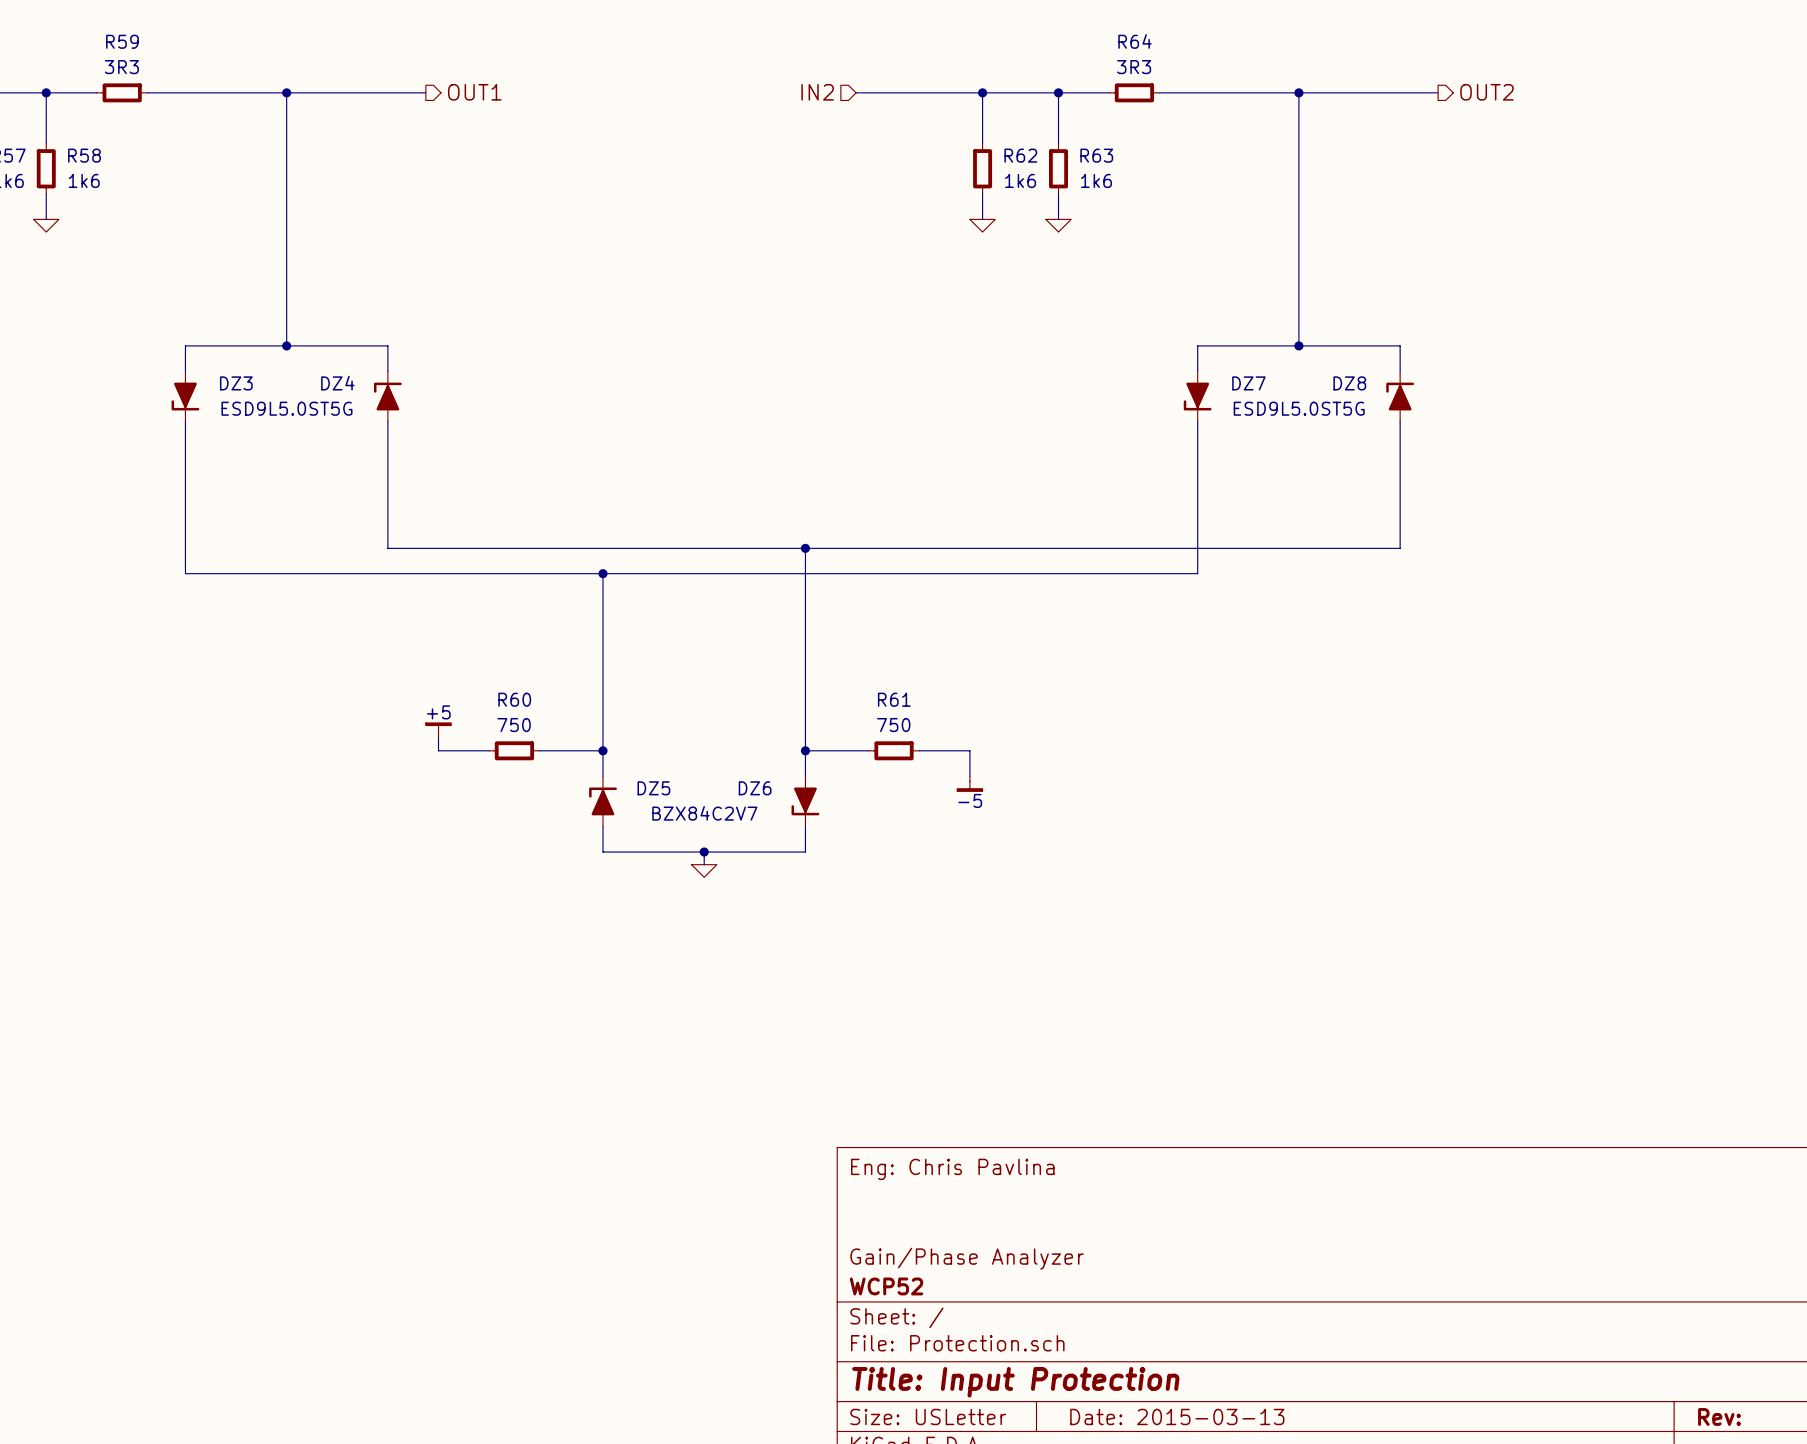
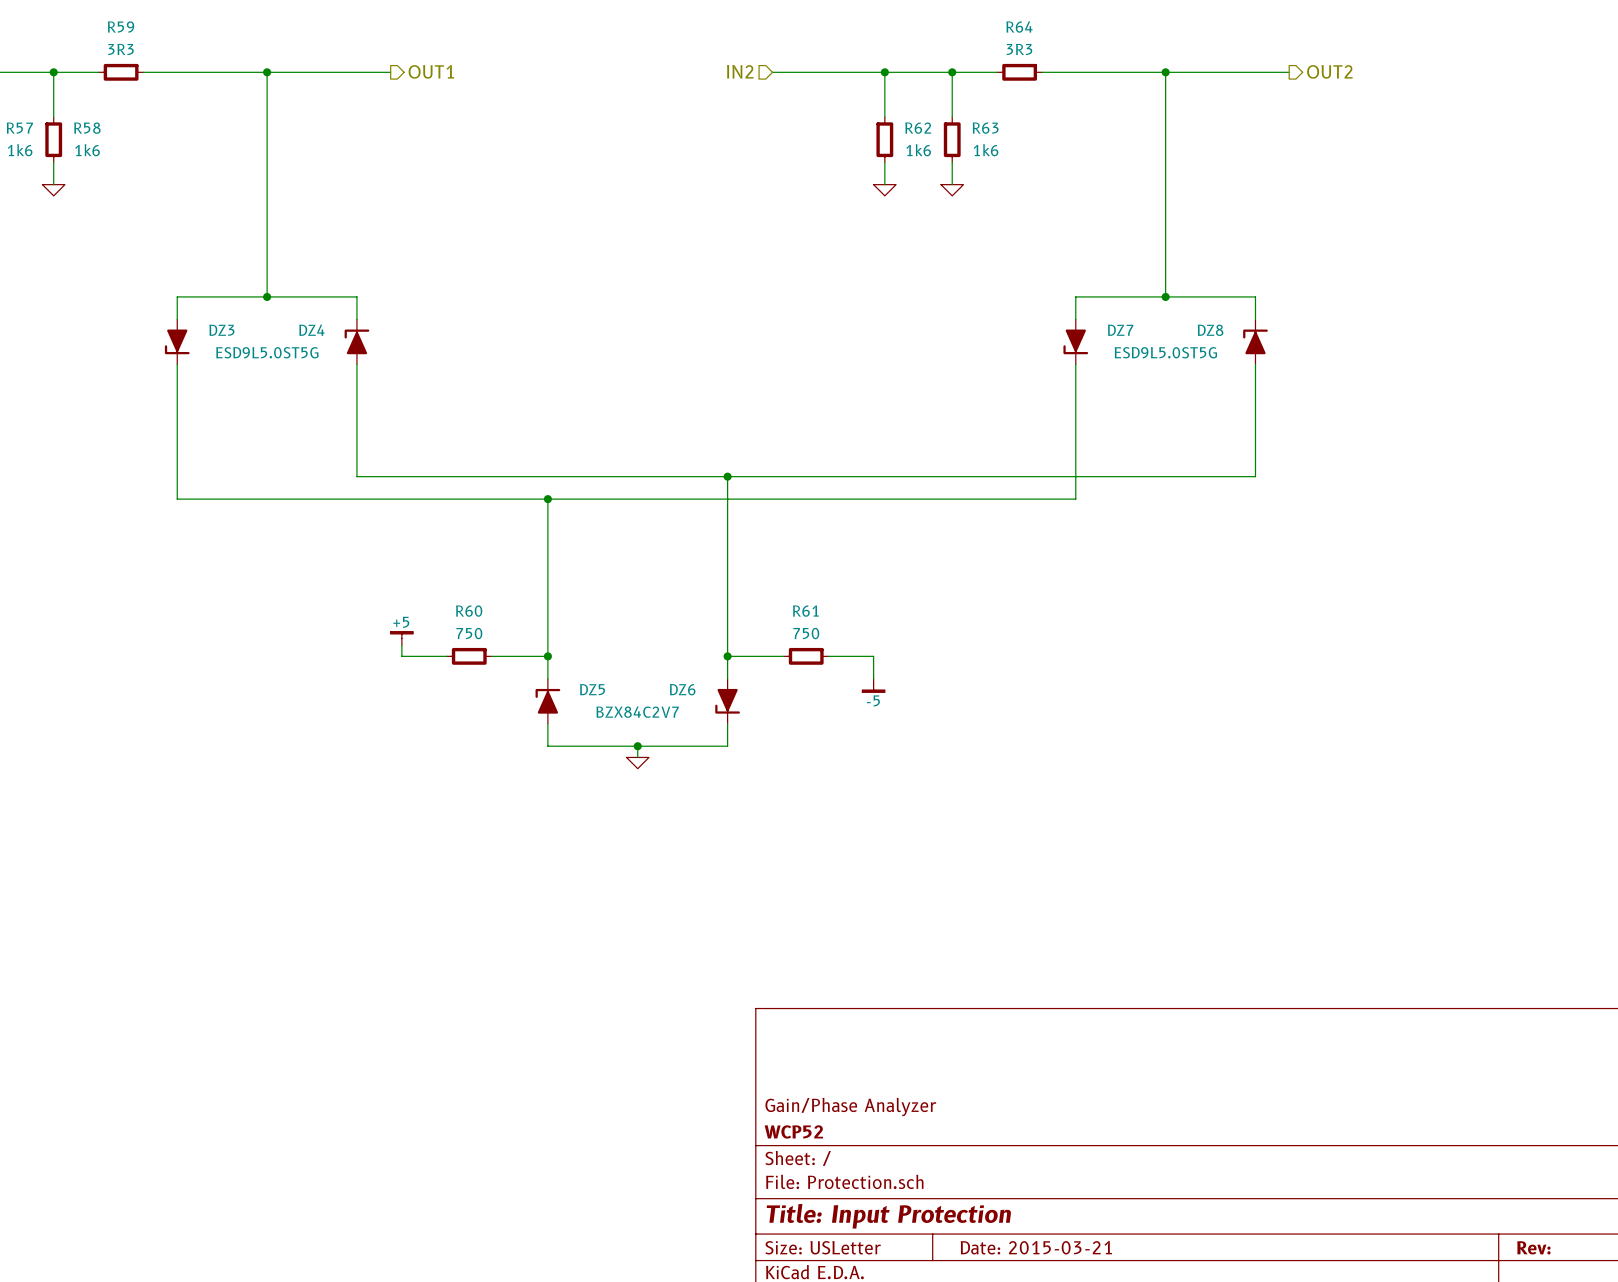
title block: Eng: Chris Pavlina (952, 1169) -> none
title block: Date: 2015-03-13 (1177, 1416) -> Date: 2015-03-21 (1036, 1247)

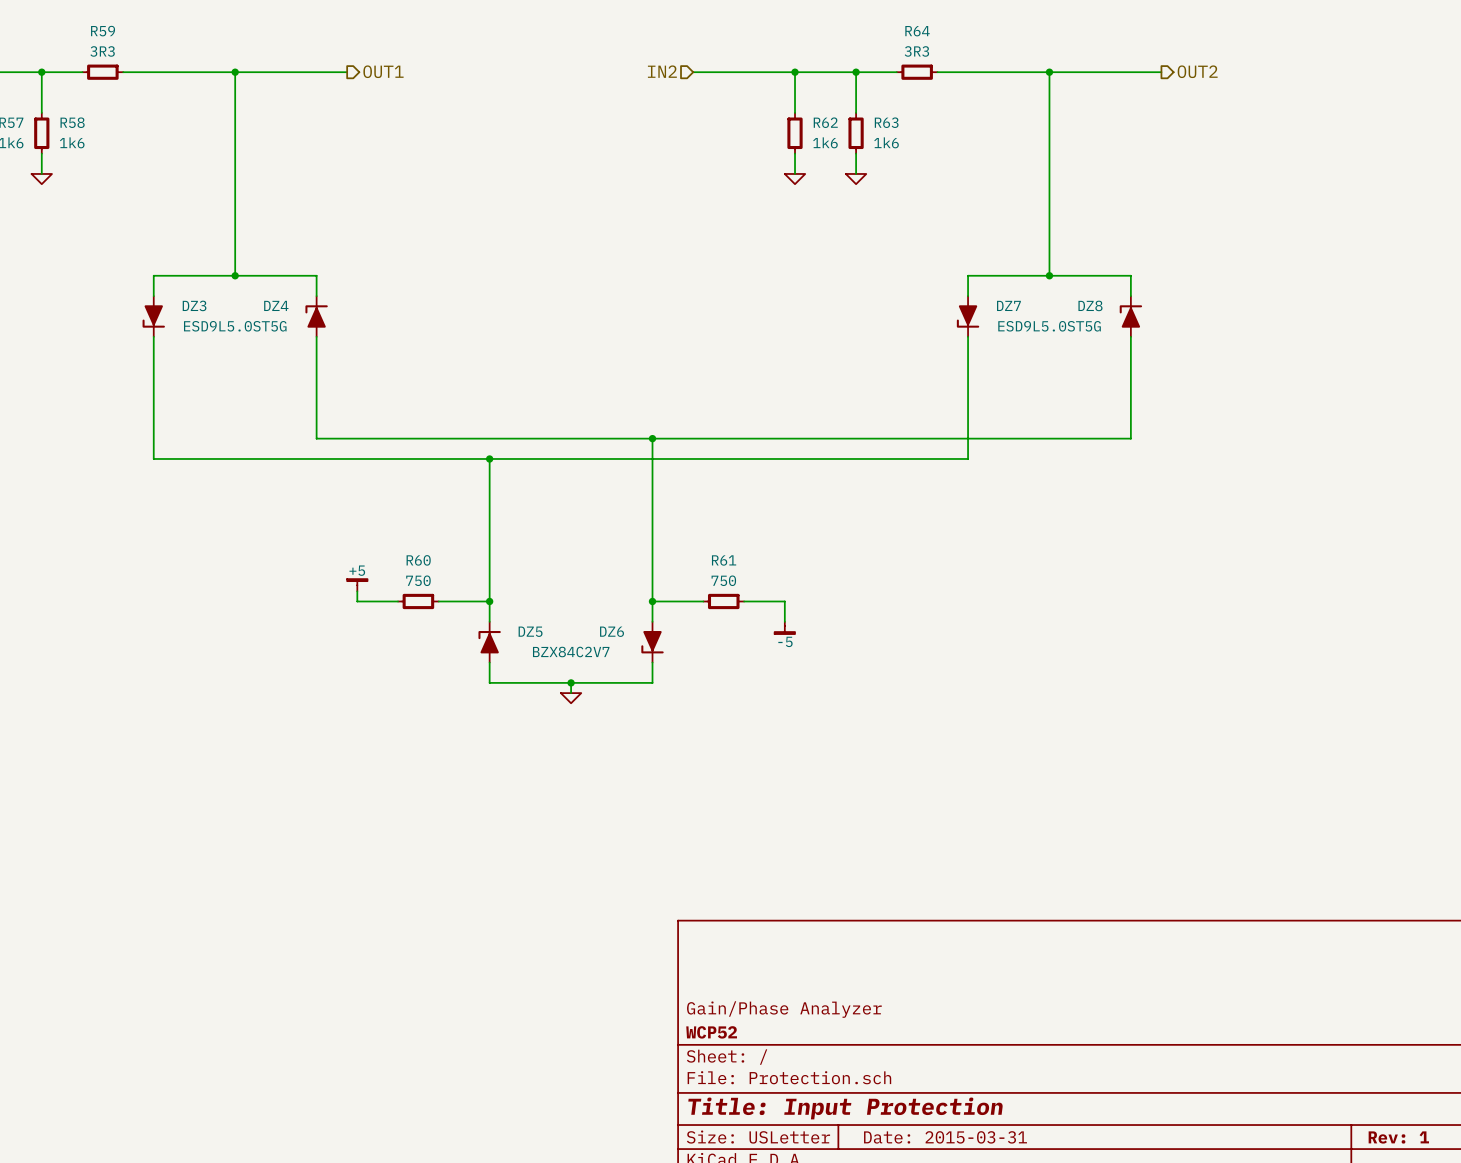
title block: Date: 2015-03-21 (1036, 1247) -> Date: 2015-03-31 (945, 1137)
title block: Rev: (1533, 1247) -> Rev: 1 (1398, 1137)

